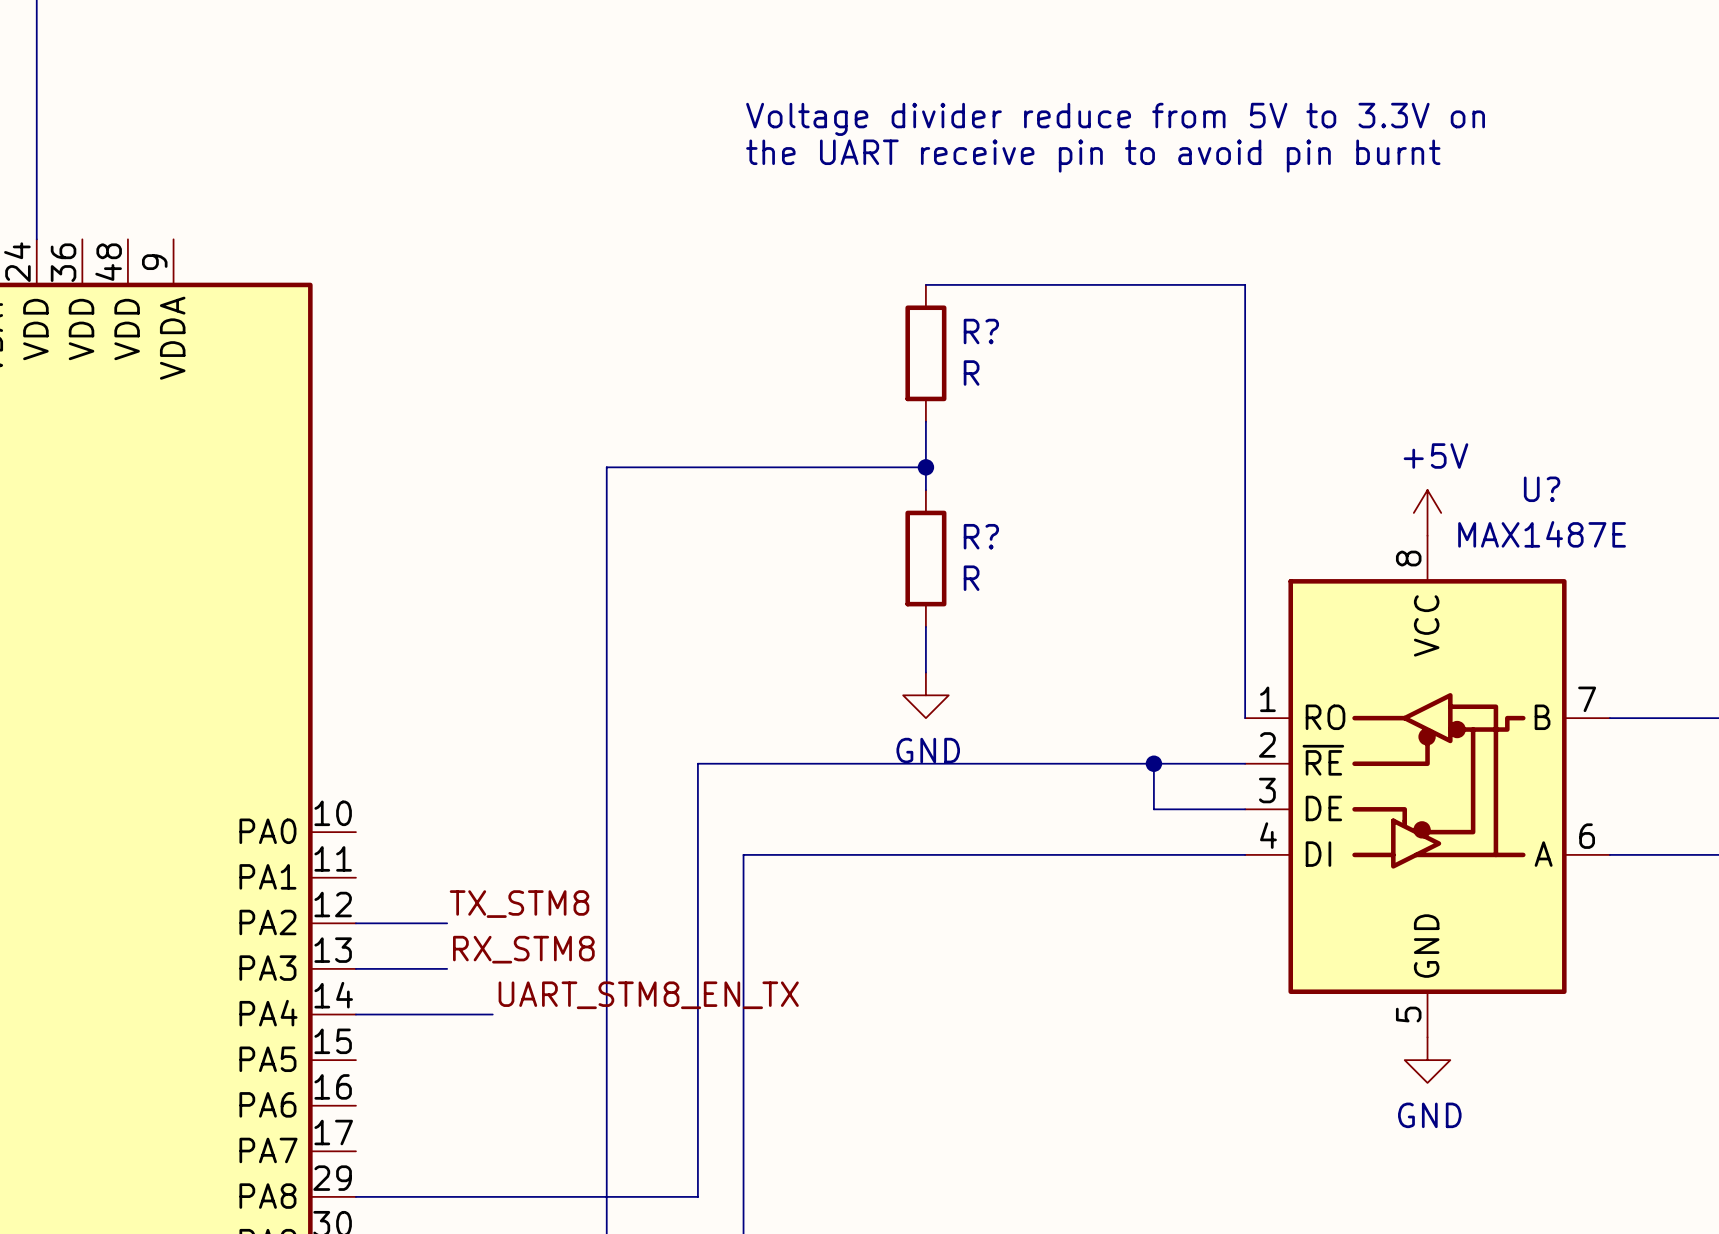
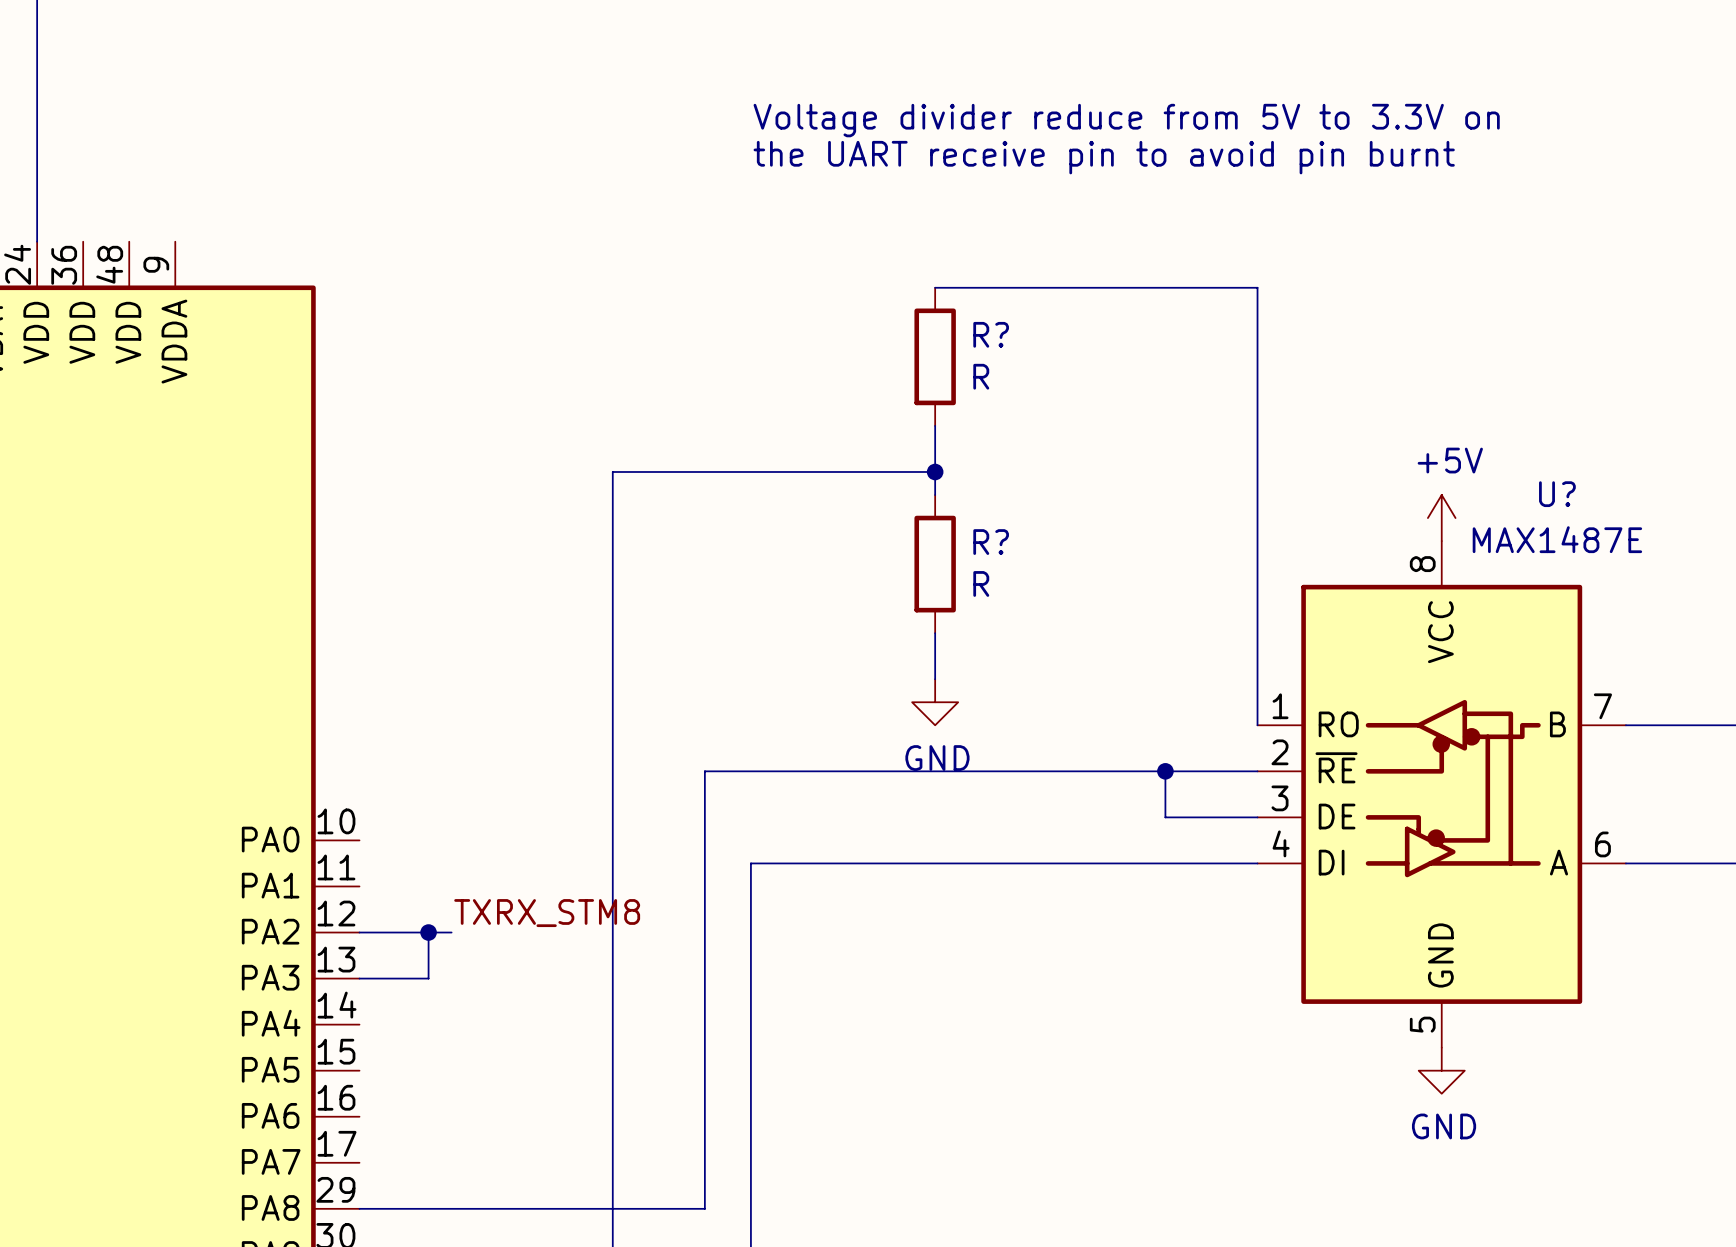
label: TX_STM8 (519, 904) -> TXRX_STM8 (547, 913)
junction: none -> (428, 932)
label: RX_STM8 (523, 949) -> none
wire: (424, 968) (447, 968) -> (428, 978) (428, 932)
label: UART_STM8_EN_TX (648, 995) -> none
wire: (355, 1014) (492, 1014) -> none

